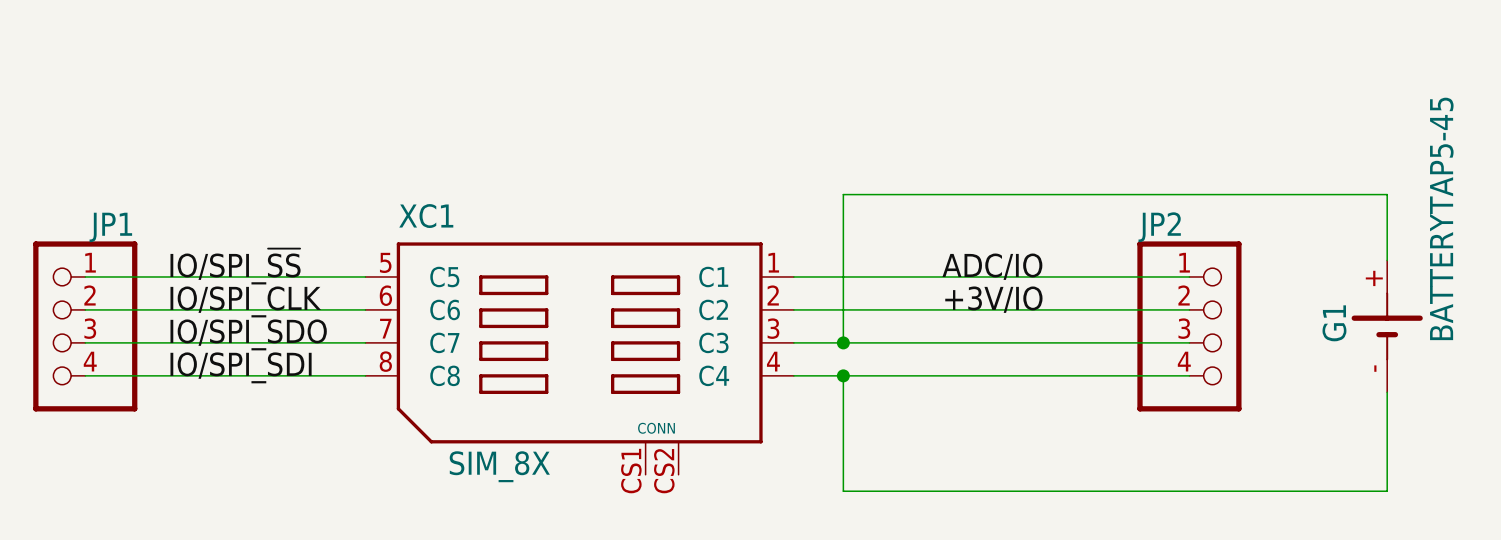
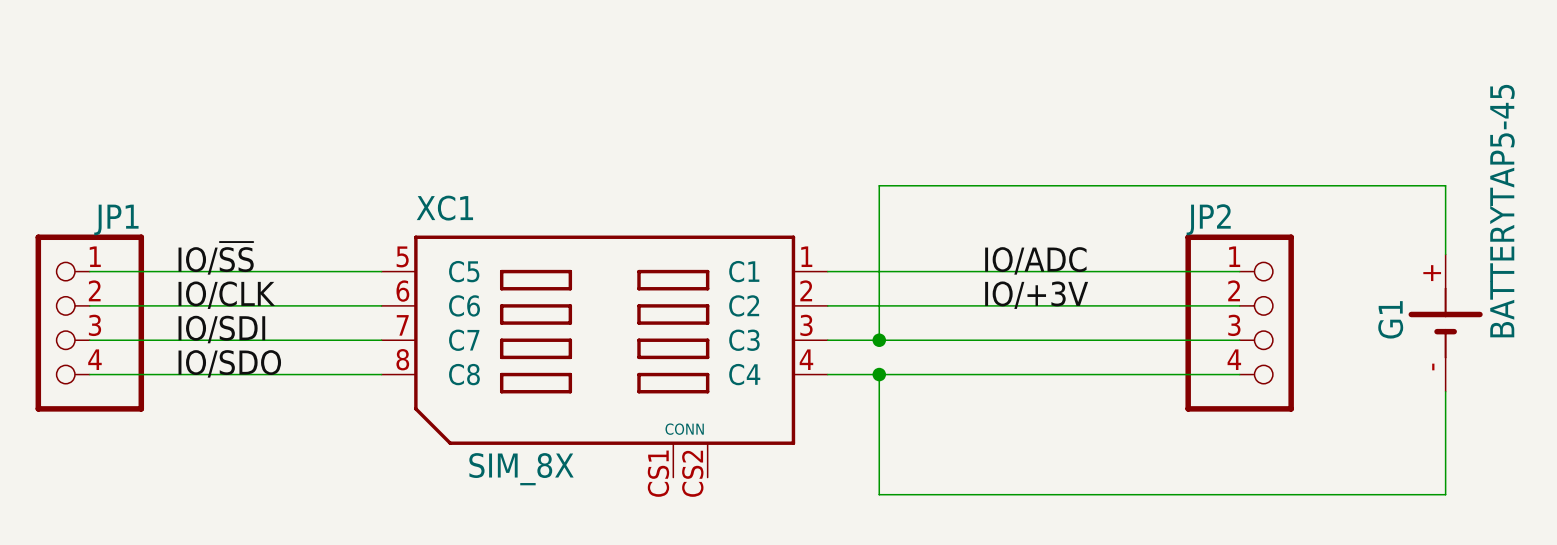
label: IO/SPI_~{SS} (235, 266) -> IO/~{SS} (216, 258)
label: ADC/IO (992, 266) -> IO/ADC (1035, 260)
label: +3V/IO (993, 299) -> IO/+3V (1036, 295)
label: IO/SPI_CLK (245, 301) -> IO/CLK (226, 295)
label: IO/SPI_SDO (248, 334) -> IO/SDI (221, 329)
label: IO/SPI_SDI (241, 367) -> IO/SDO (229, 363)

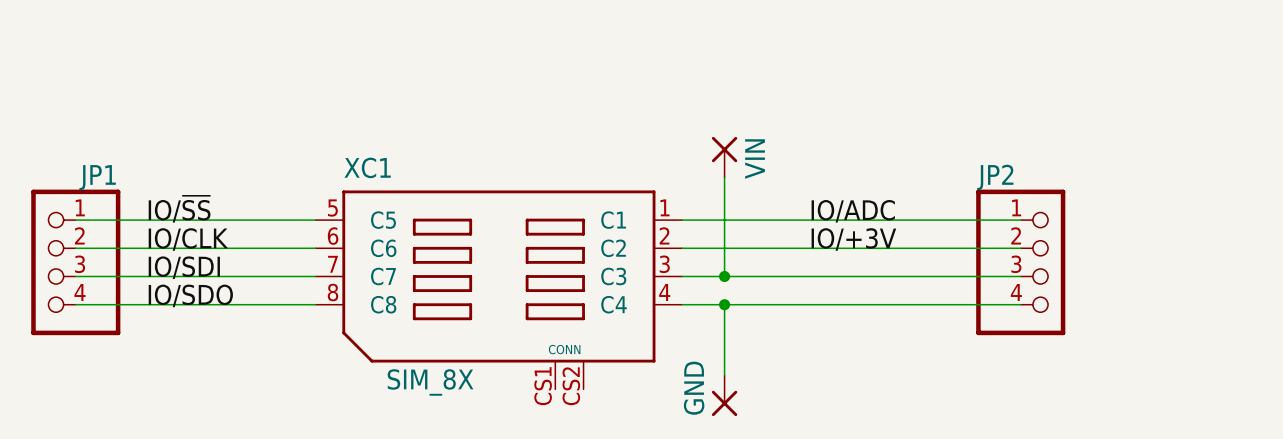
VIN: none -> (724, 157)
wire: (879, 220) (879, 185) (1445, 185) (1445, 254) -> none
G1: BATTERYTAP5-45 (1445, 323) -> none
wire: (1445, 391) (1445, 494) (879, 494) (879, 460) -> none
GND: none -> (724, 395)

